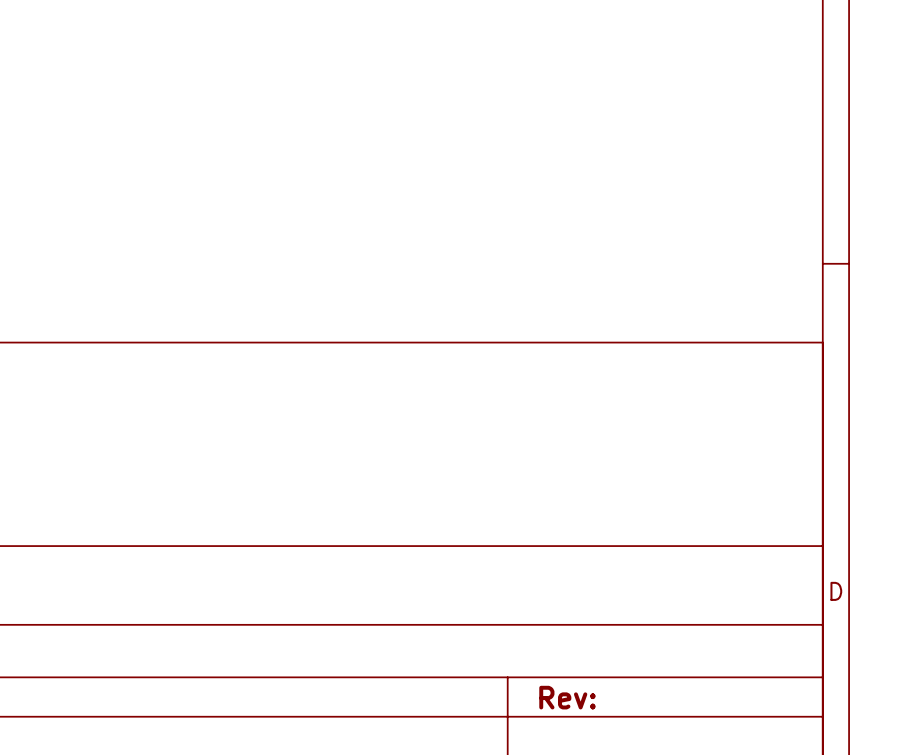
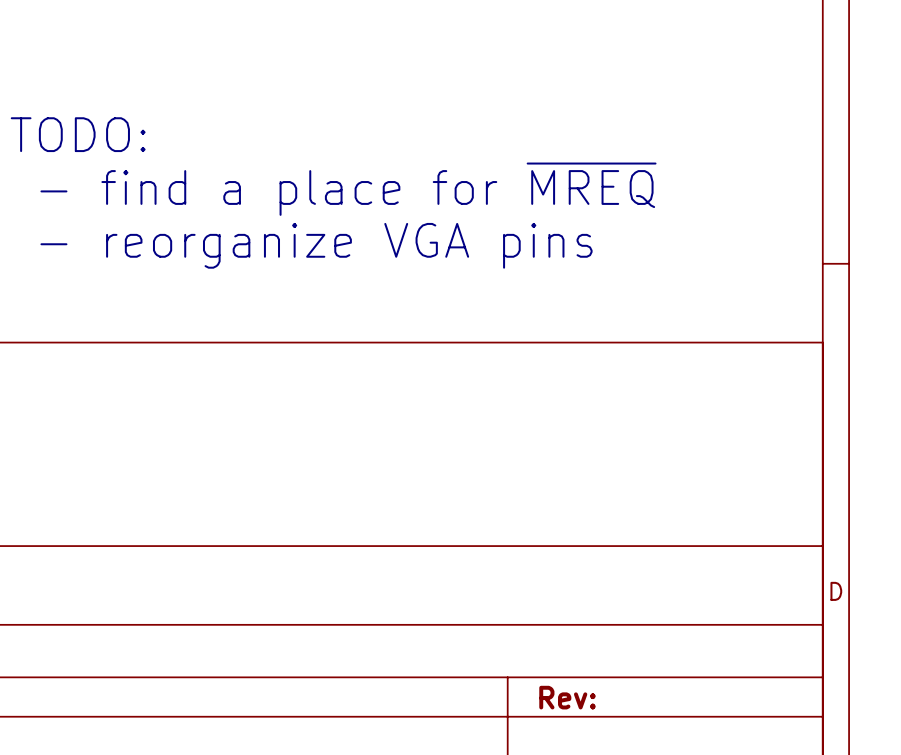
text: none -> TODO: (78, 134)
text: none -> - find a place for ~{MREQ} (348, 189)
text: none -> - reorganize VGA pins (316, 245)

